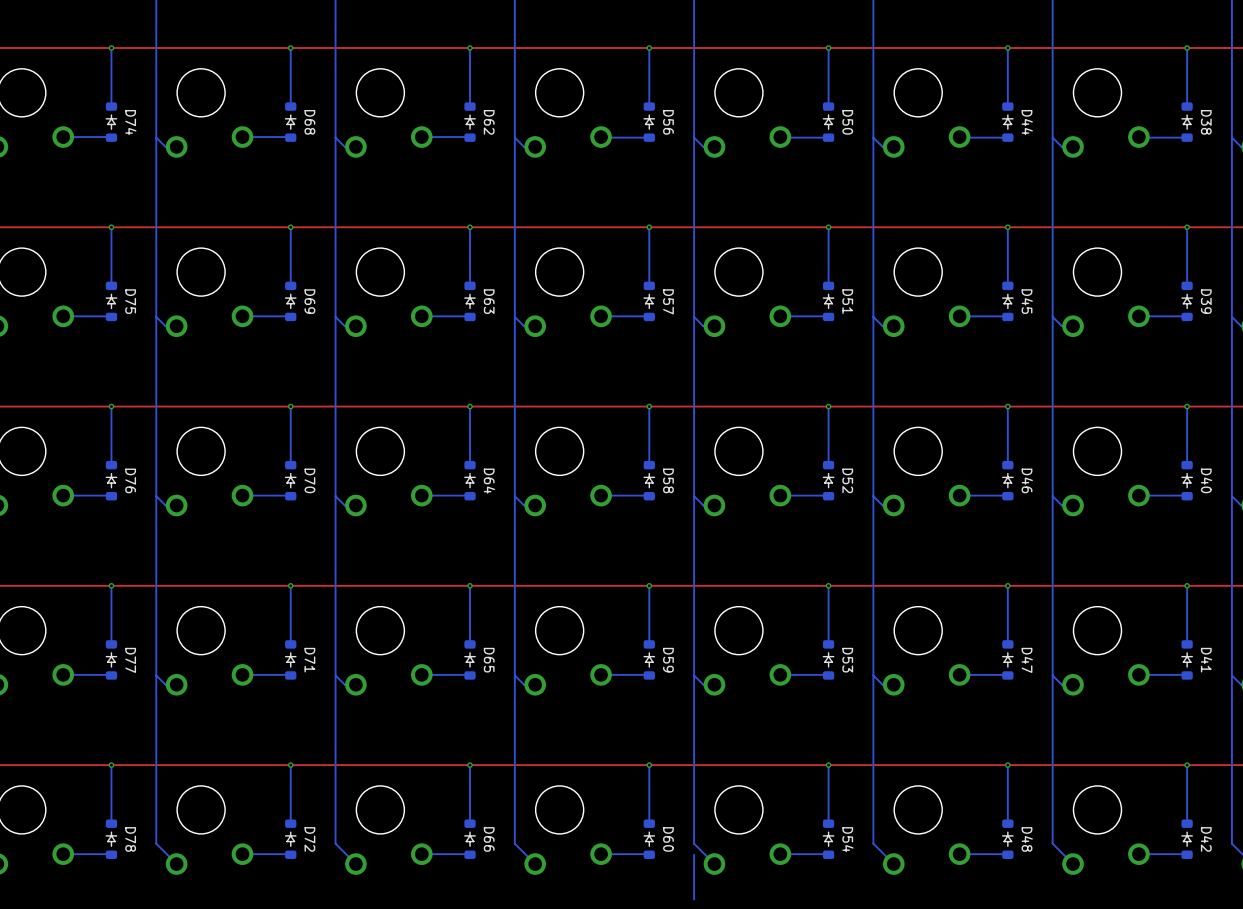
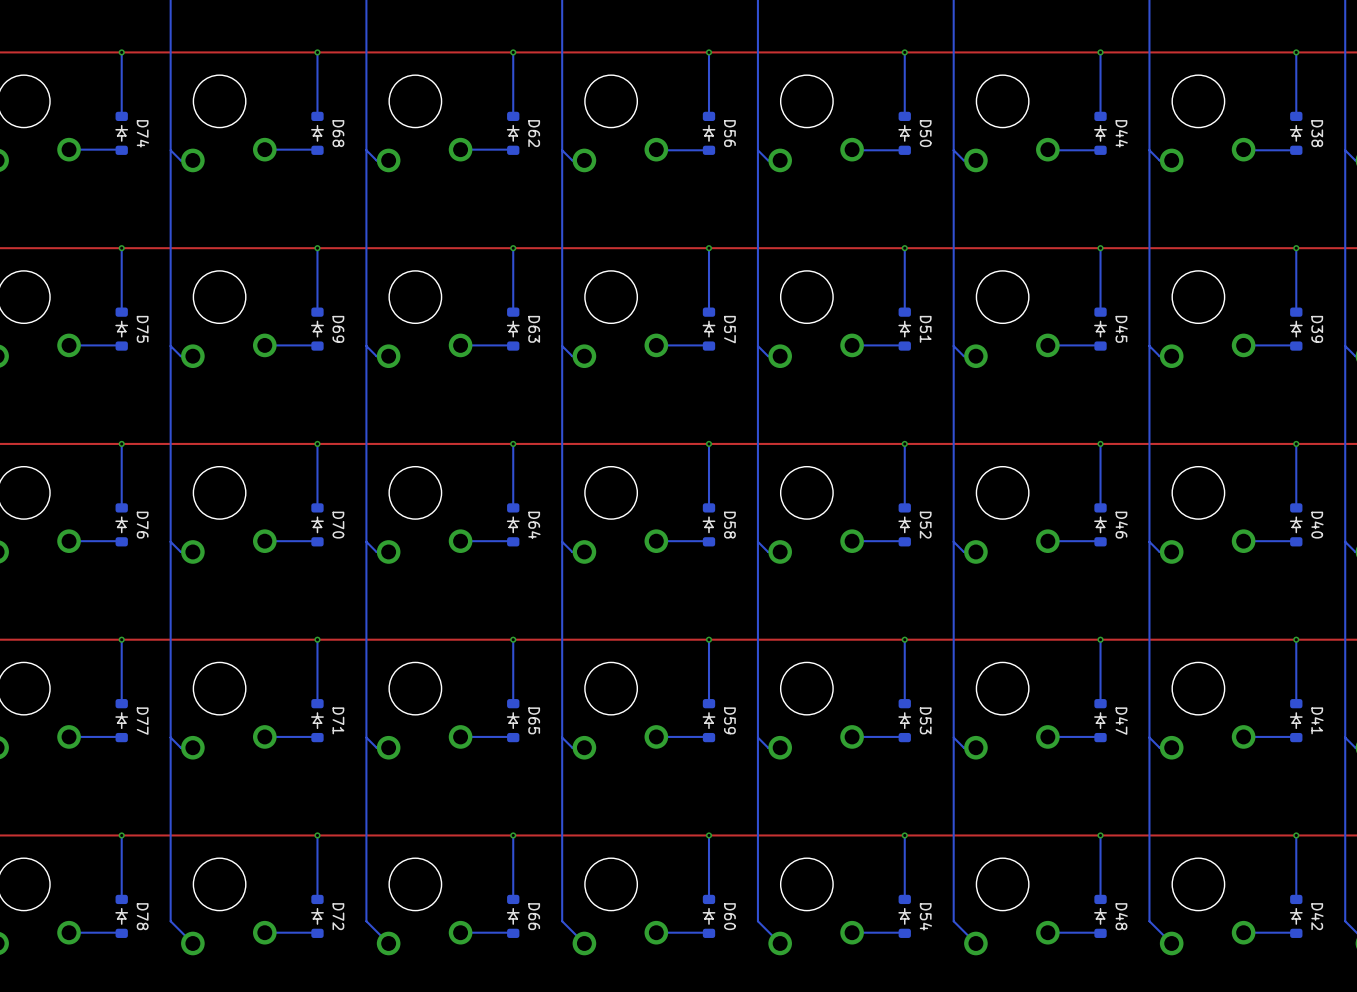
bottom track: (694, 854) (694, 899) -> none

